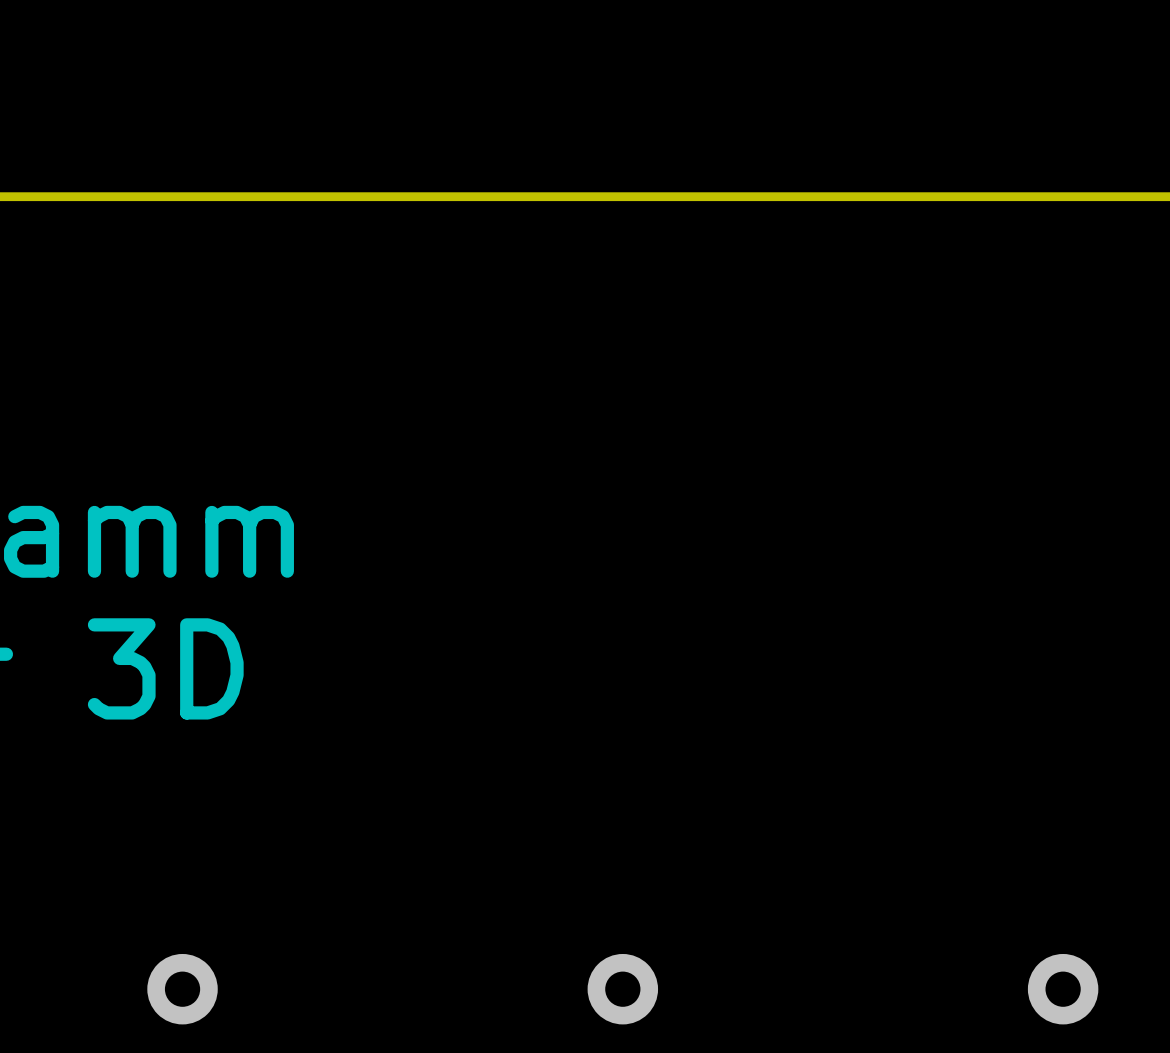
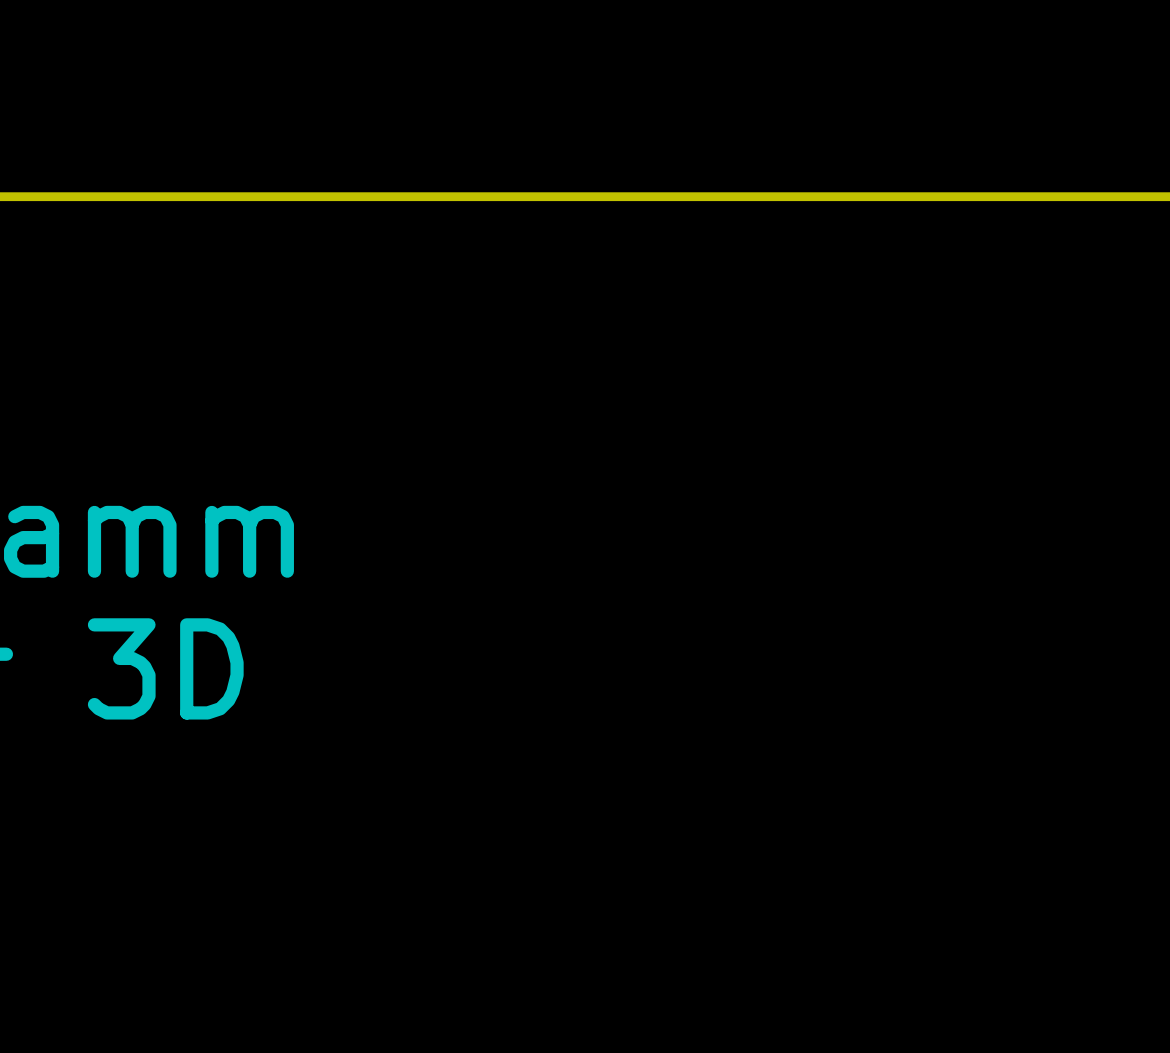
via: (182, 989) -> none
via: (622, 989) -> none
via: (1063, 989) -> none

